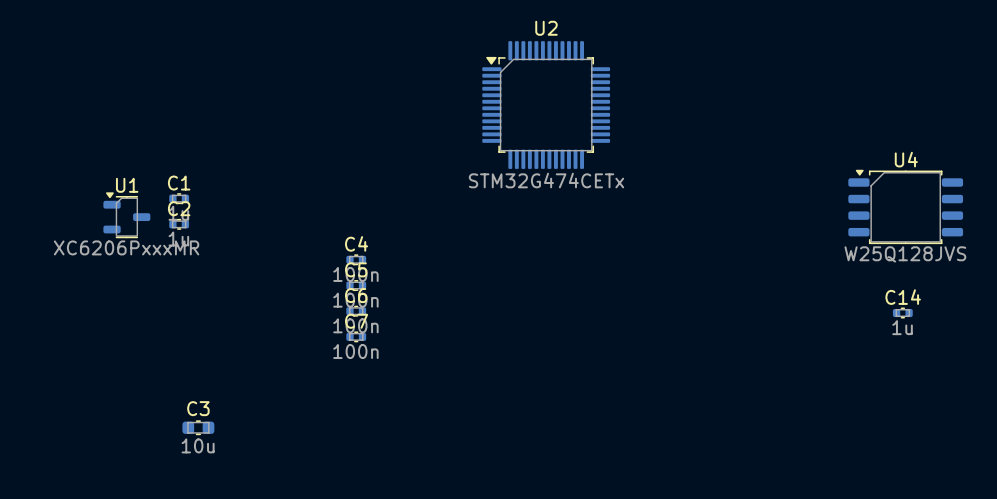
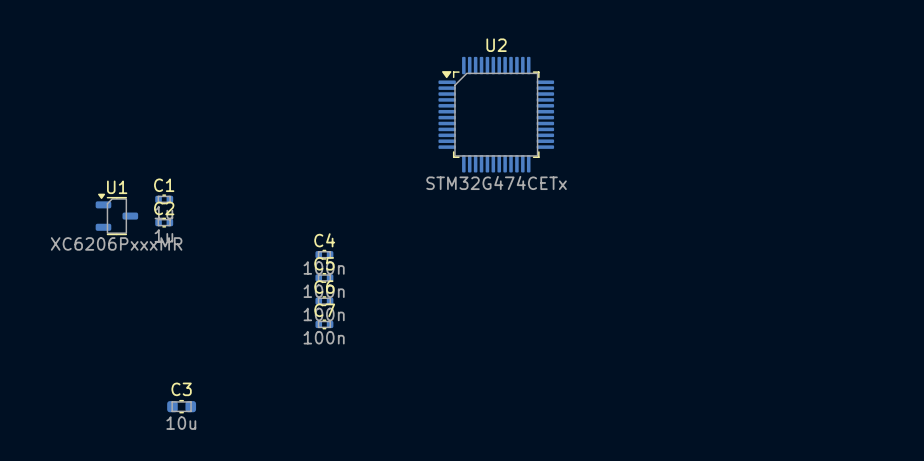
U4: W25Q128JVS (905, 206) -> none
C14: 1u (902, 313) -> none

